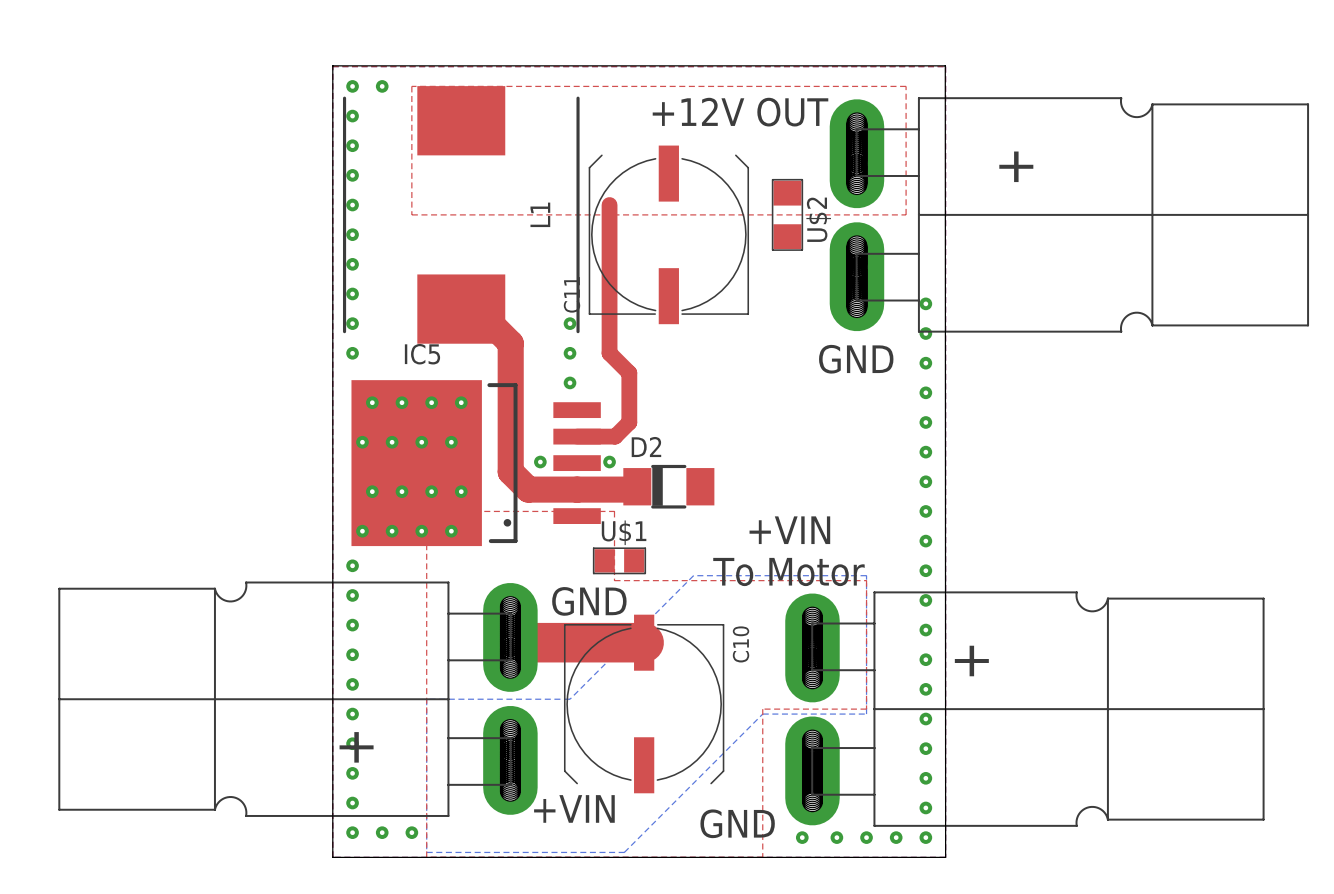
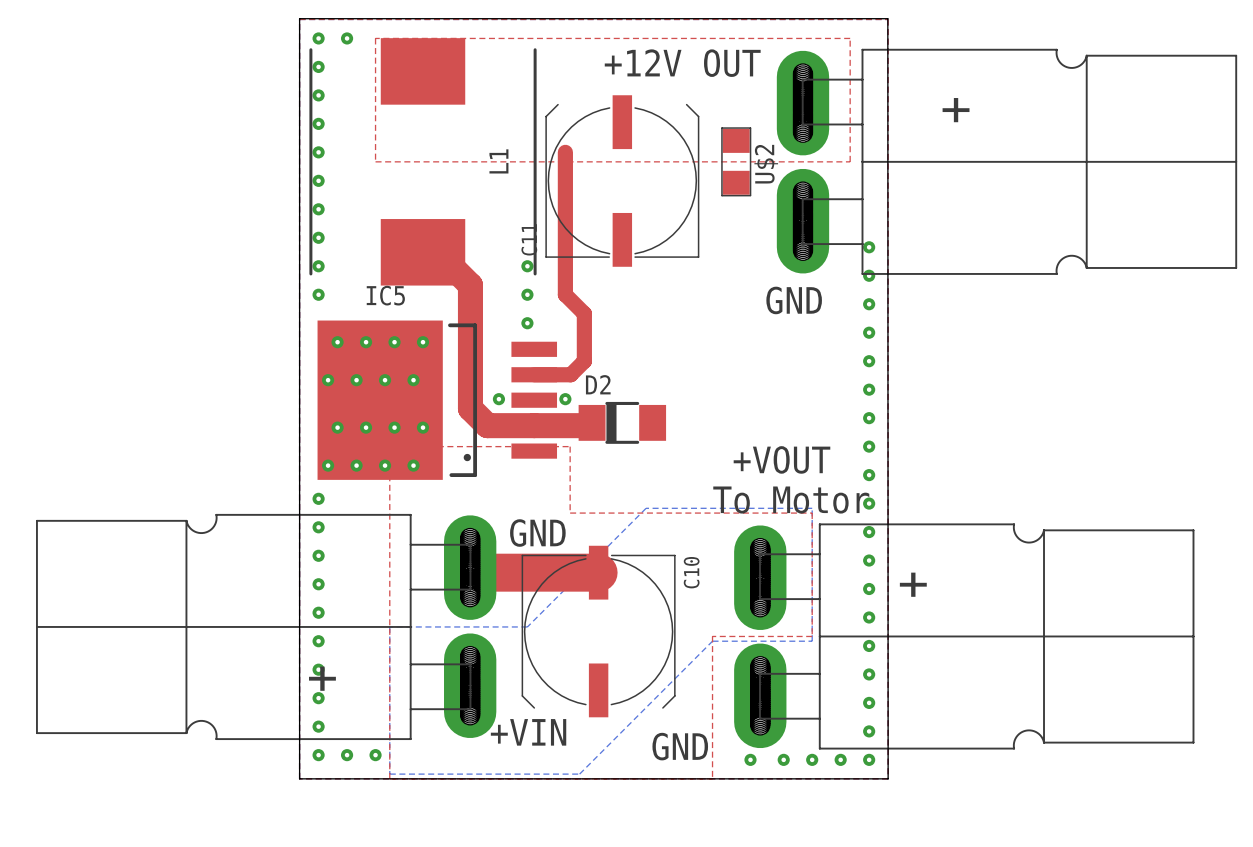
text: none -> +VOUT (781, 459)
text: +VIN (789, 530) -> none
U$1: (619, 560) -> none
text position: To Motor (788, 572) -> To Motor (791, 500)

